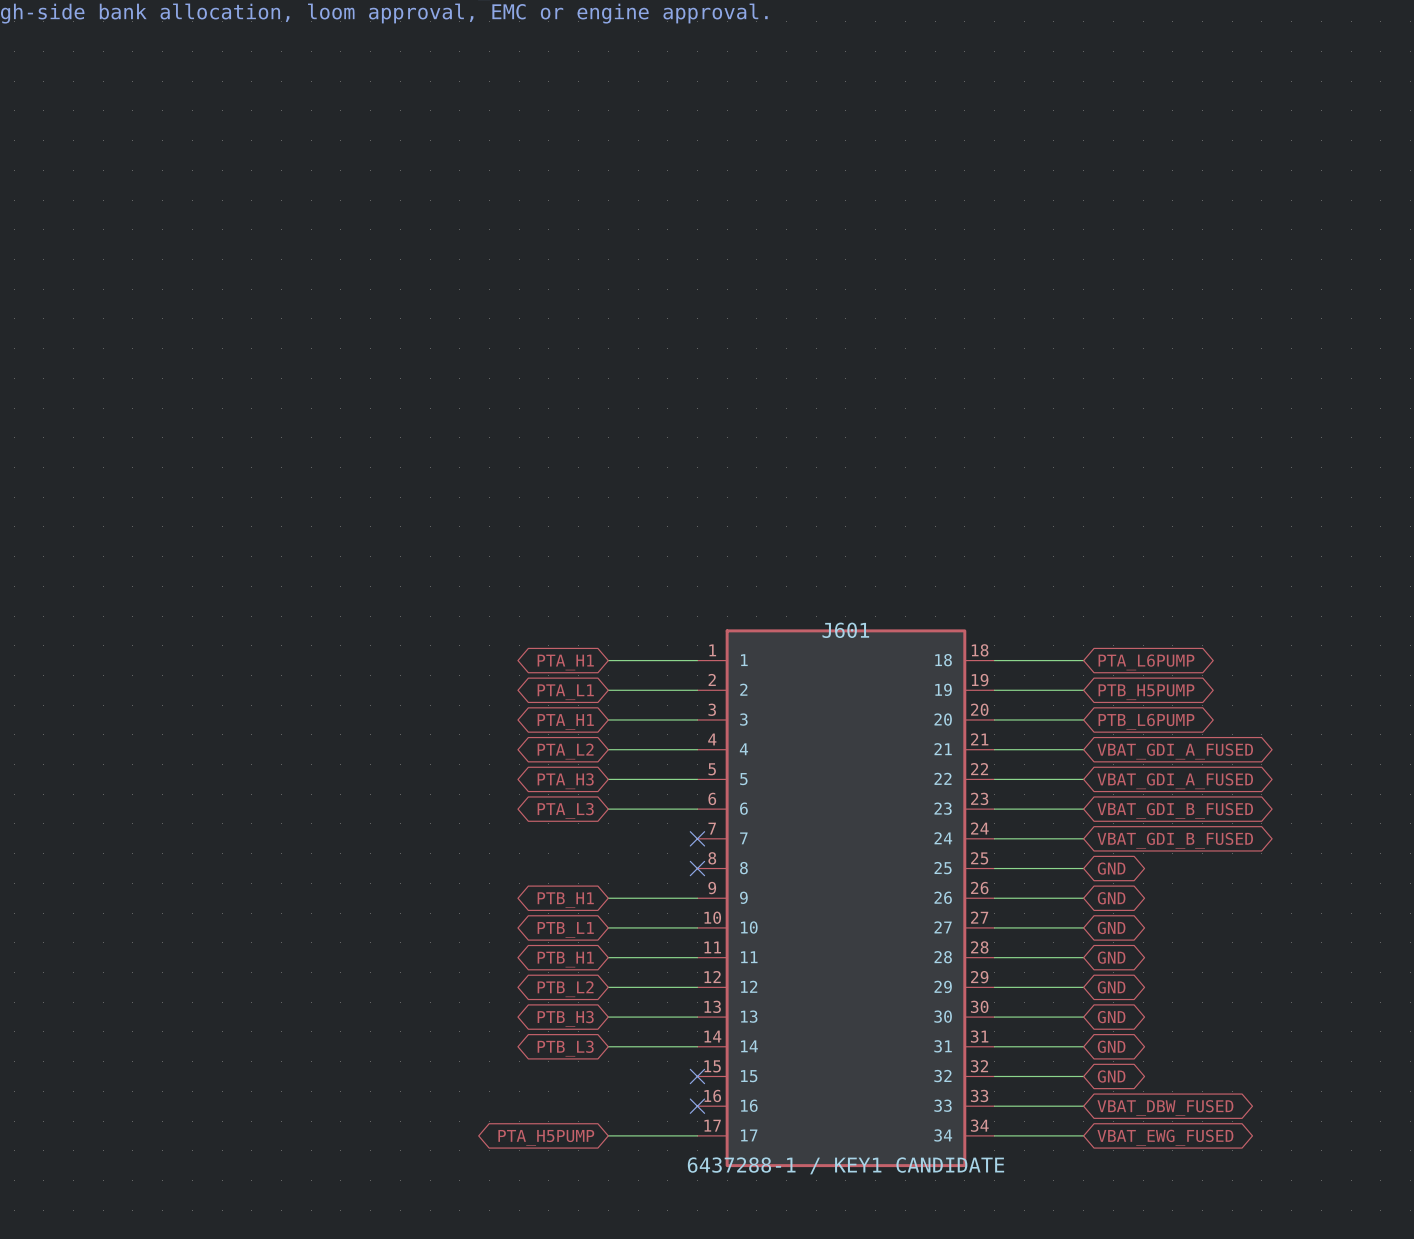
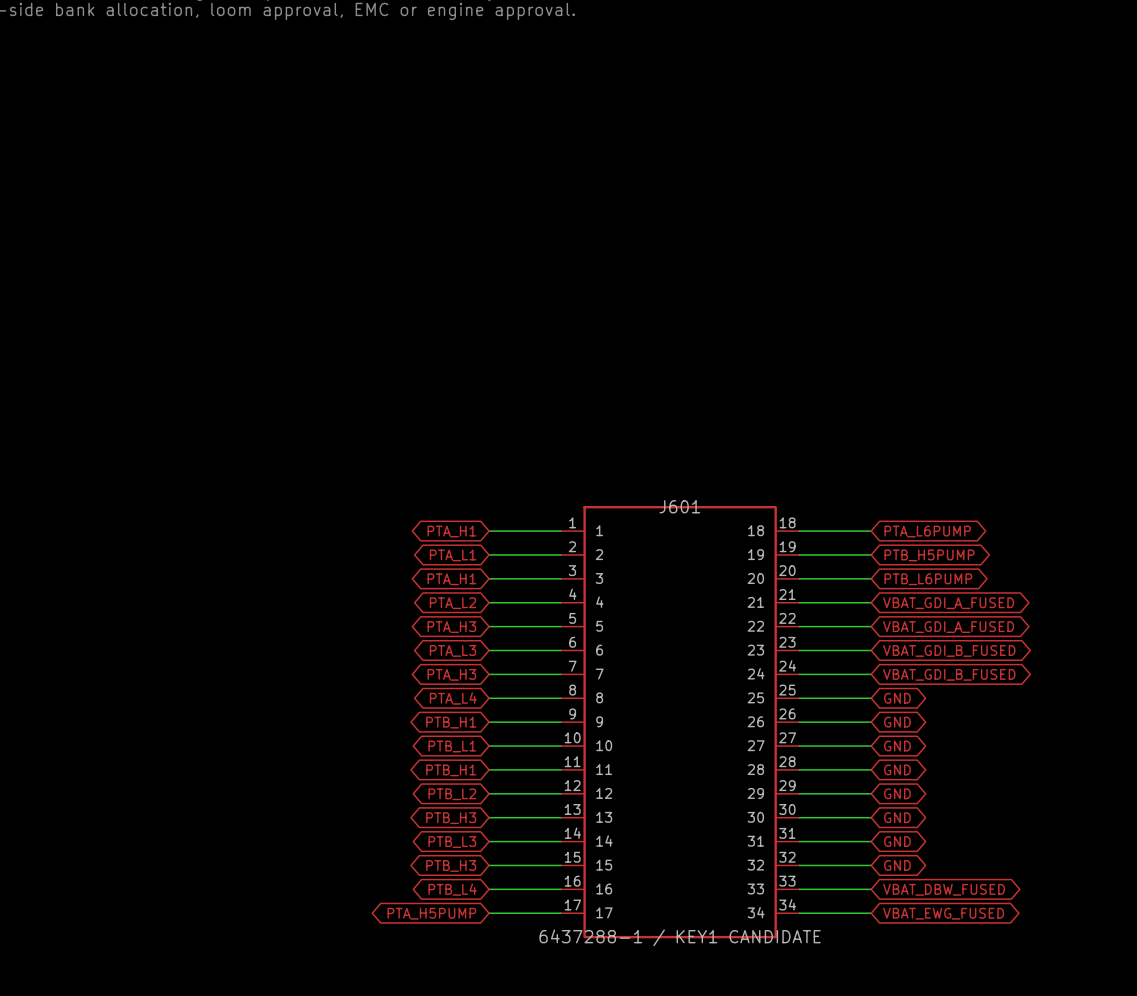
wire: none -> (489, 674) (560, 674)
no-connect mark: (697, 838) -> none
global label: none -> PTA_H3 (451, 674)
wire: none -> (489, 698) (560, 698)
no-connect mark: (697, 868) -> none
global label: none -> PTA_L4 (453, 698)
wire: none -> (489, 865) (560, 865)
no-connect mark: (697, 1076) -> none
global label: none -> PTB_H3 (451, 865)
wire: none -> (489, 889) (560, 889)
no-connect mark: (697, 1106) -> none
global label: none -> PTB_L4 (452, 889)

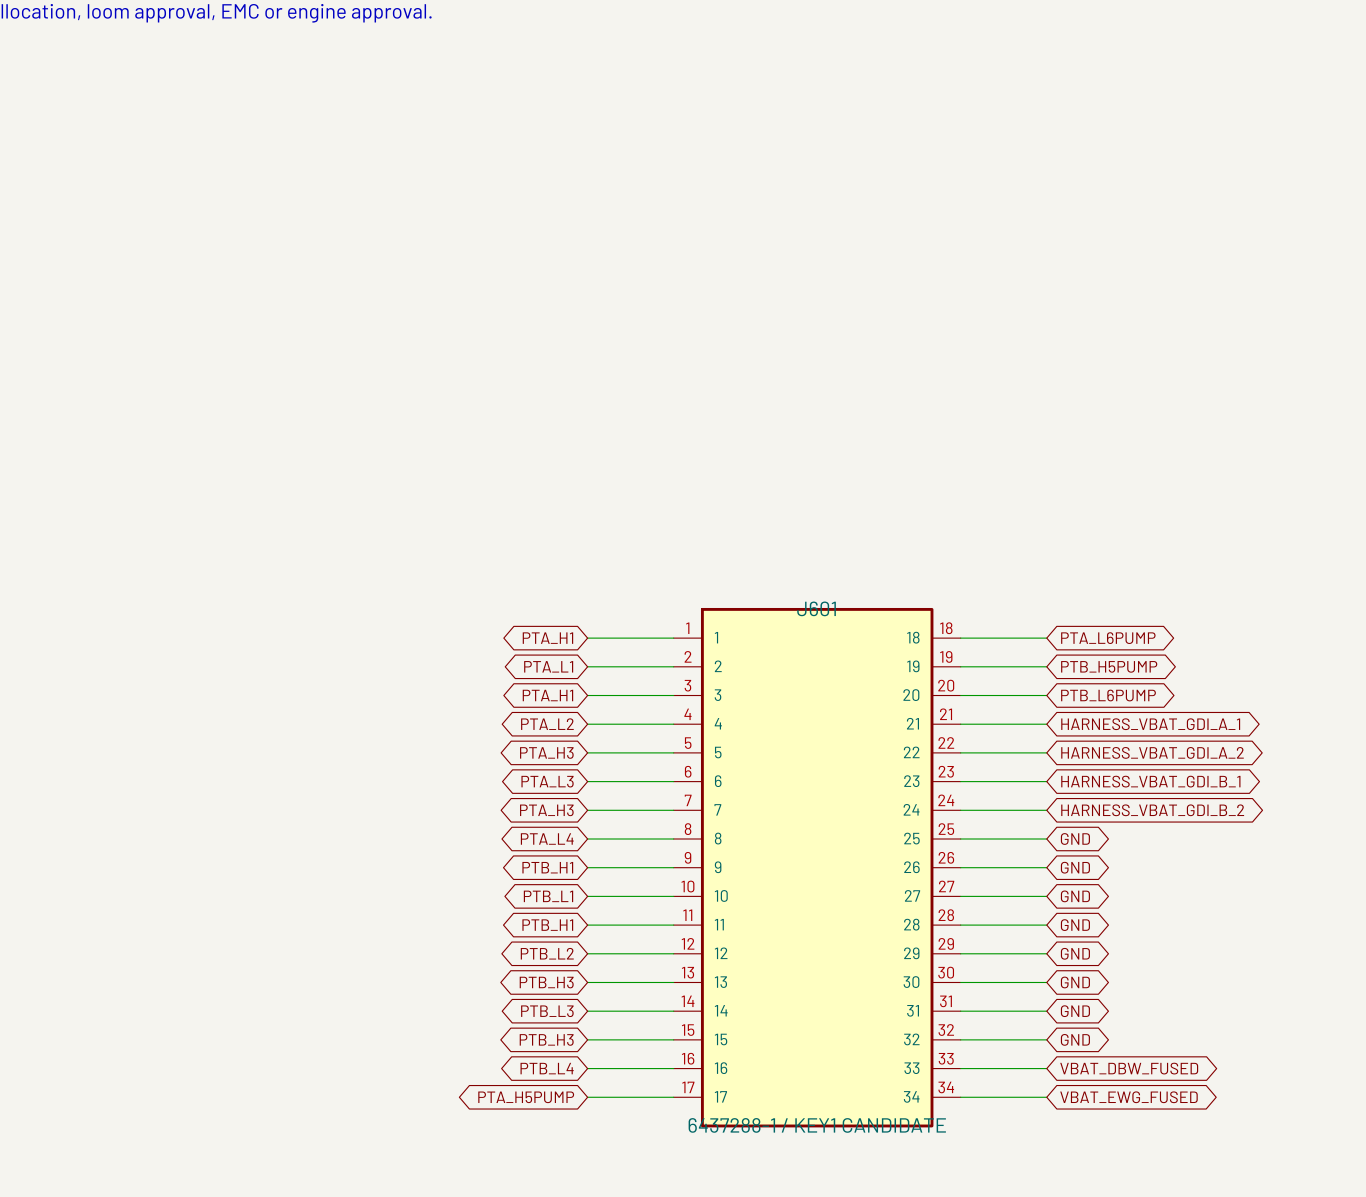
global label: VBAT_GDI_A_FUSED (948, 603) -> HARNESS_VBAT_GDI_A_1 (1150, 724)
global label: VBAT_GDI_A_FUSED (948, 627) -> HARNESS_VBAT_GDI_A_2 (1152, 752)
global label: VBAT_GDI_B_FUSED (949, 650) -> HARNESS_VBAT_GDI_B_1 (1150, 781)
global label: VBAT_GDI_B_FUSED (949, 674) -> HARNESS_VBAT_GDI_B_2 (1152, 810)

